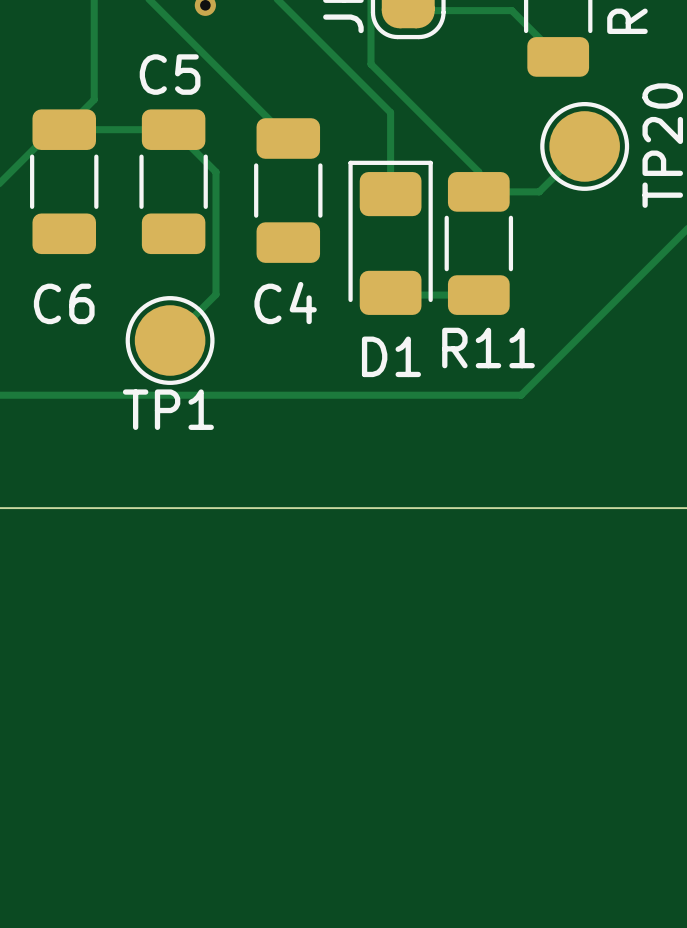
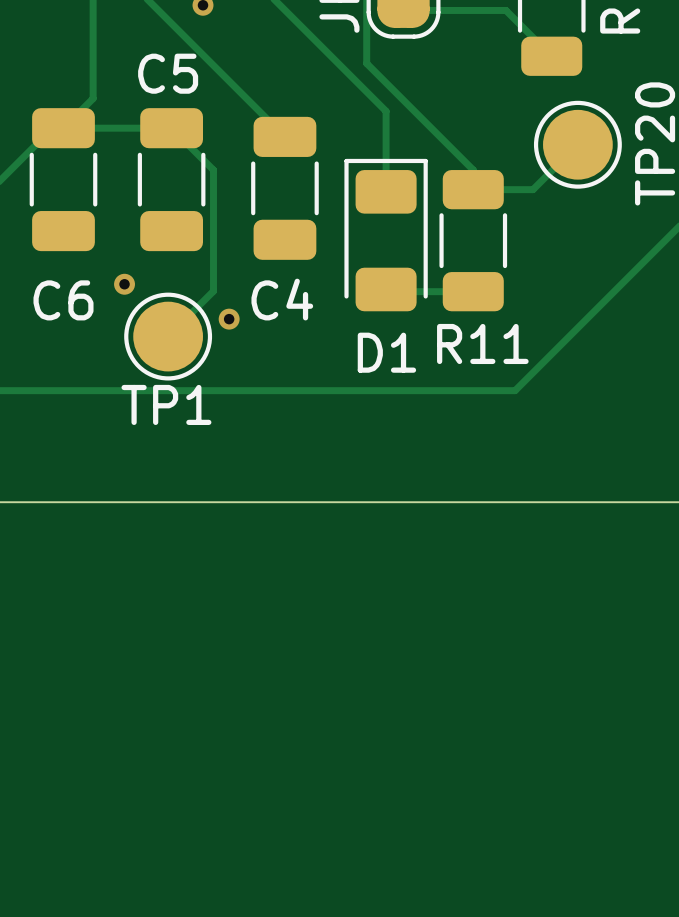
via: none -> (124, 284)
via: none -> (229, 319)

